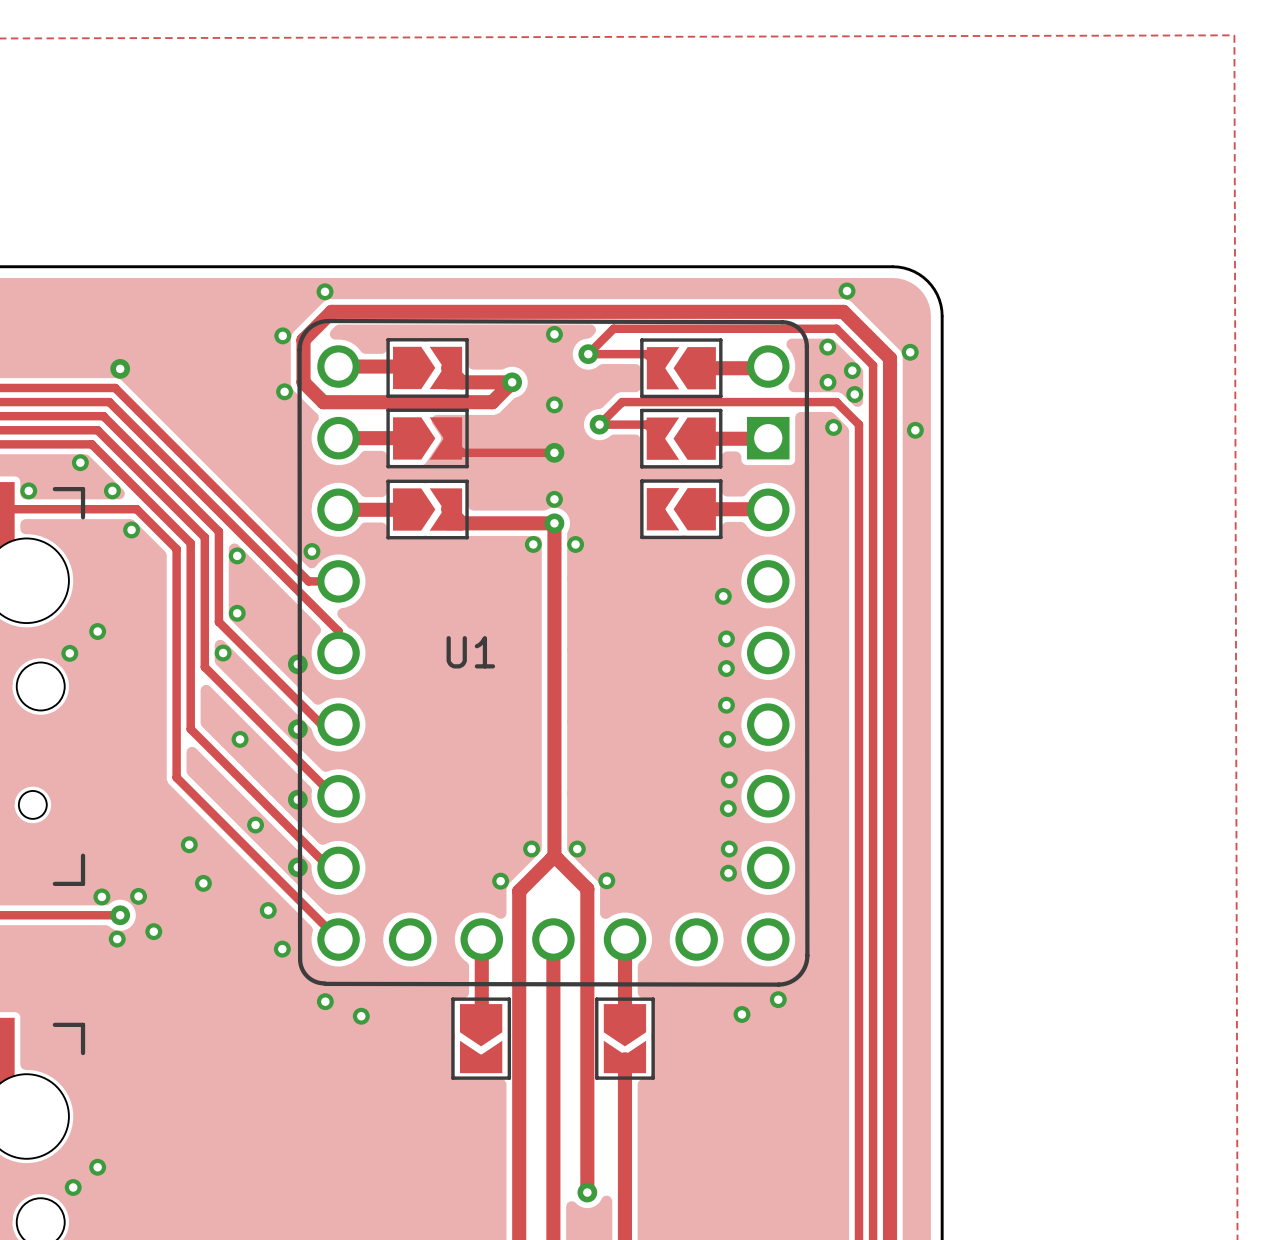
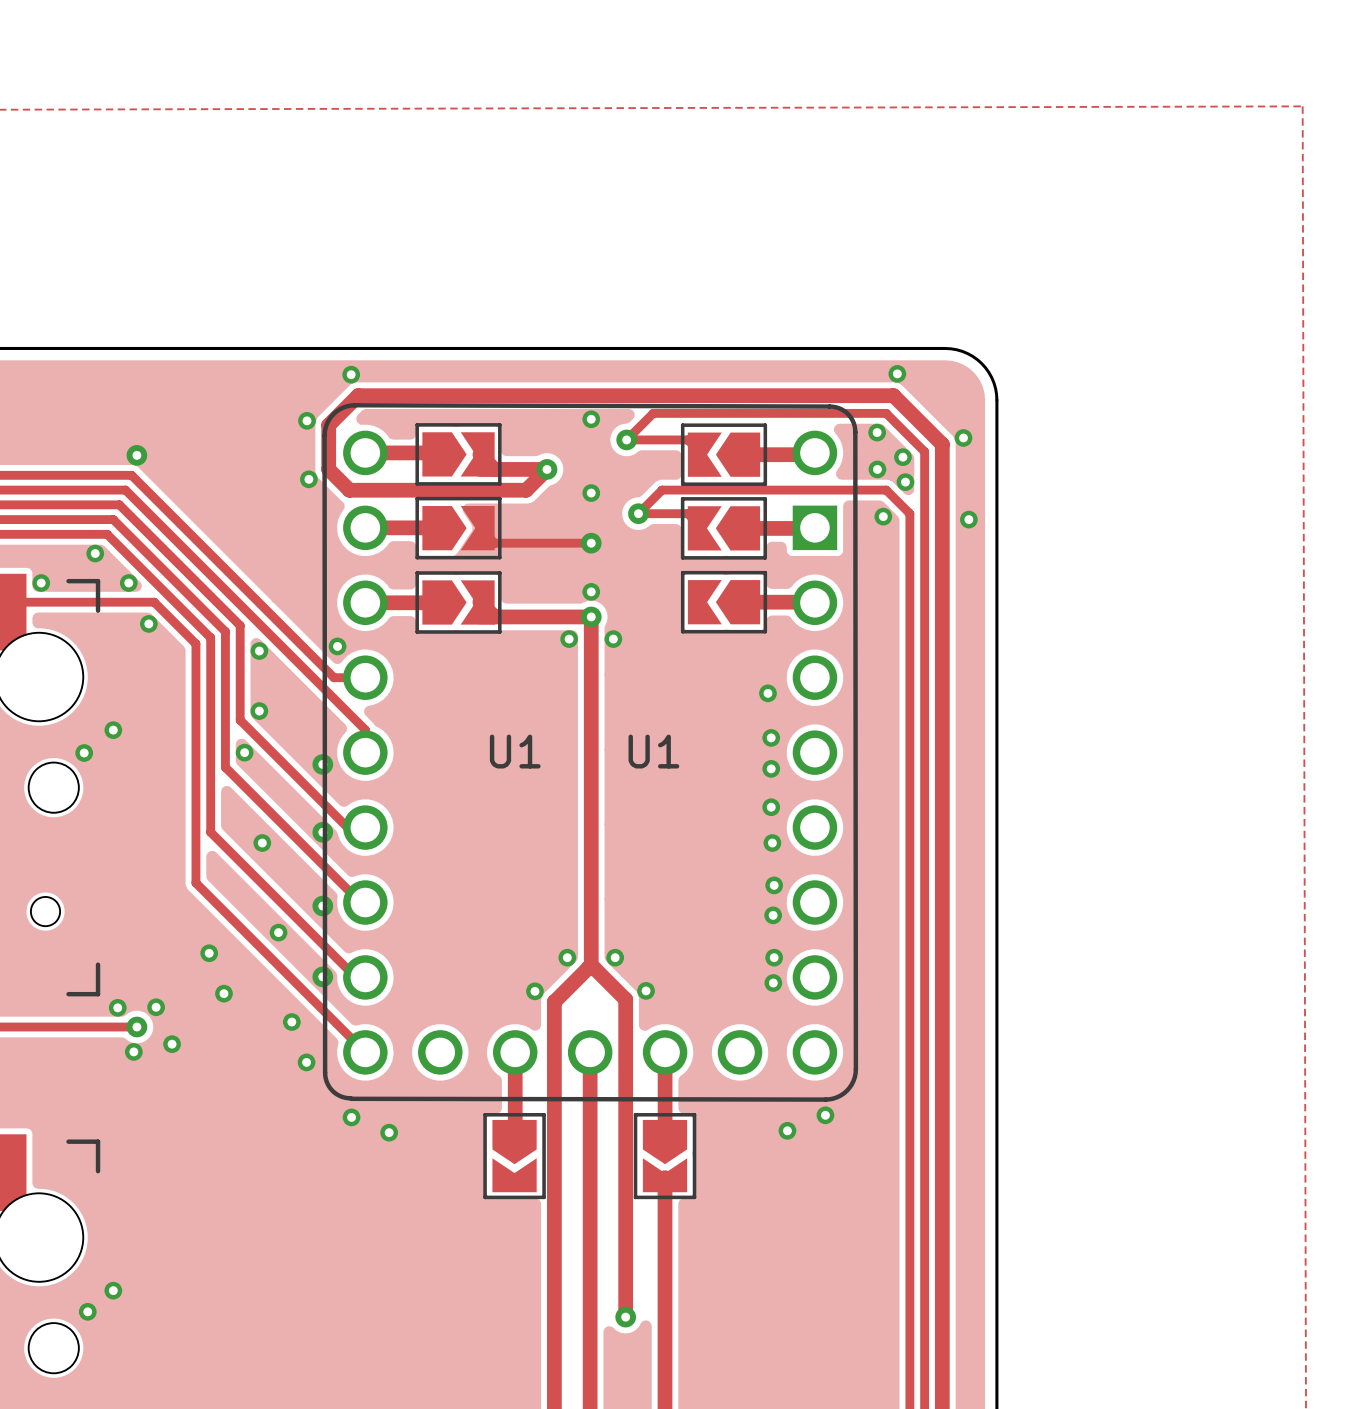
text: none -> U1 (515, 751)
text: none -> U1 (653, 751)
U1 name: U1 (470, 652) -> none

